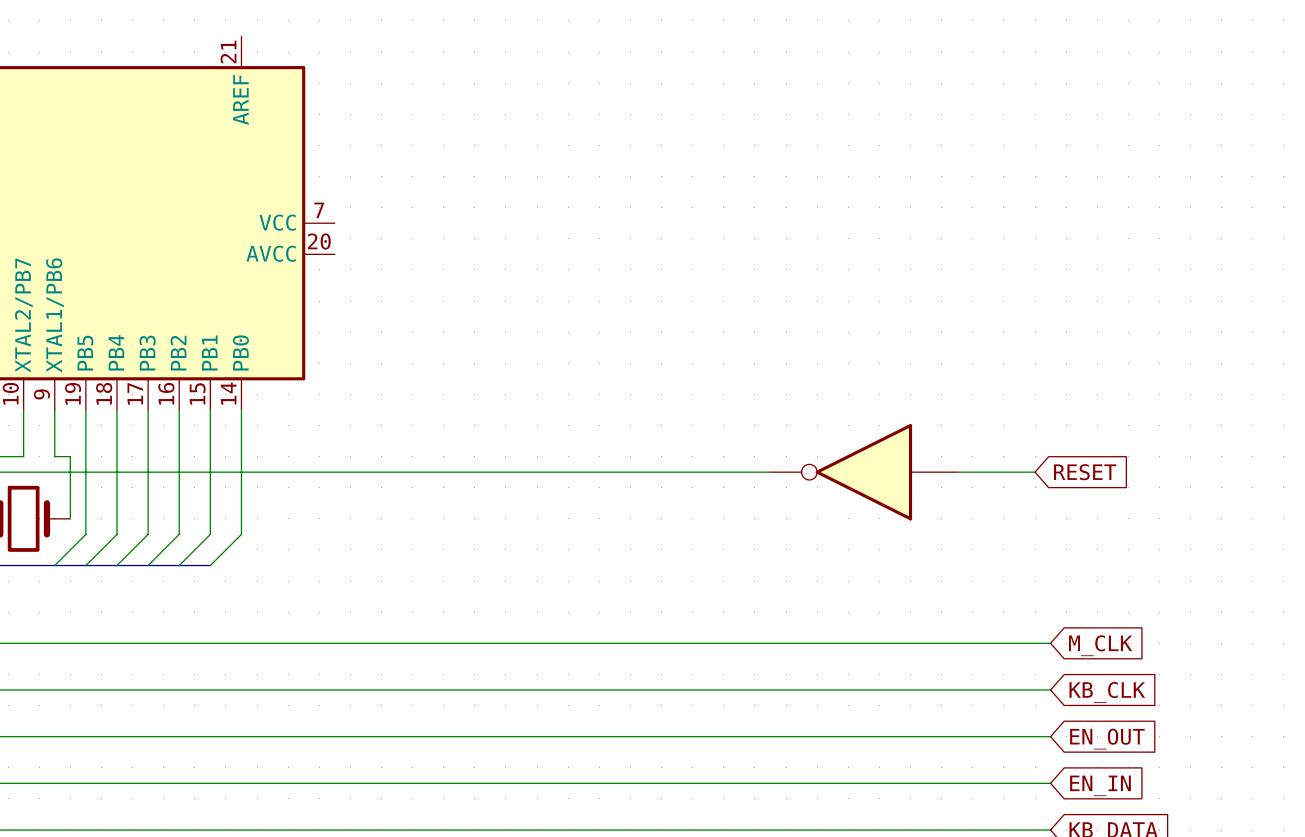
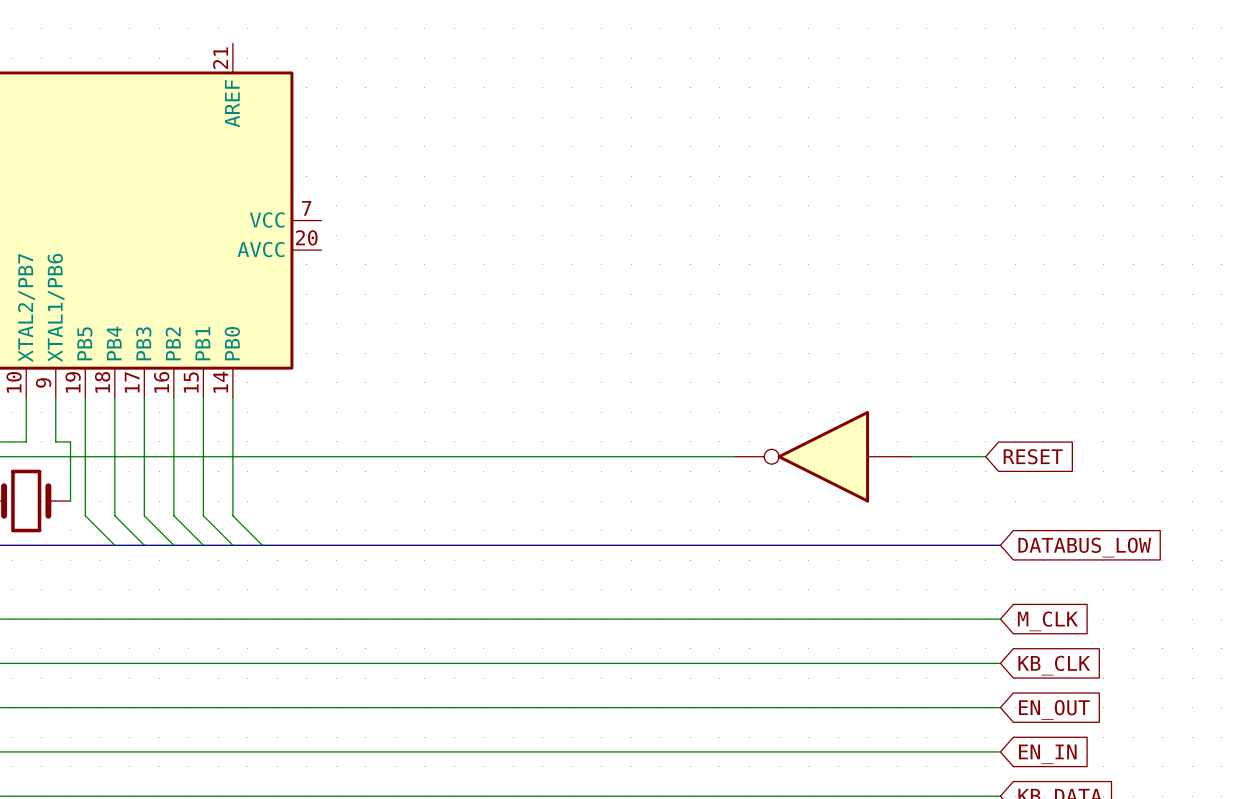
wire: (85, 534) (54, 565) -> (85, 515) (114, 545)
wire: (116, 534) (85, 565) -> (114, 515) (144, 545)
wire: (148, 534) (116, 565) -> none
wire: (179, 534) (148, 565) -> (173, 515) (203, 545)
wire: (210, 534) (179, 565) -> (144, 515) (173, 545)
wire: none -> (203, 515) (232, 545)
wire: (241, 534) (210, 565) -> (232, 515) (262, 545)
bus: none -> (203, 545) (1000, 545)
global label: none -> DATABUS_LOW (1084, 547)

